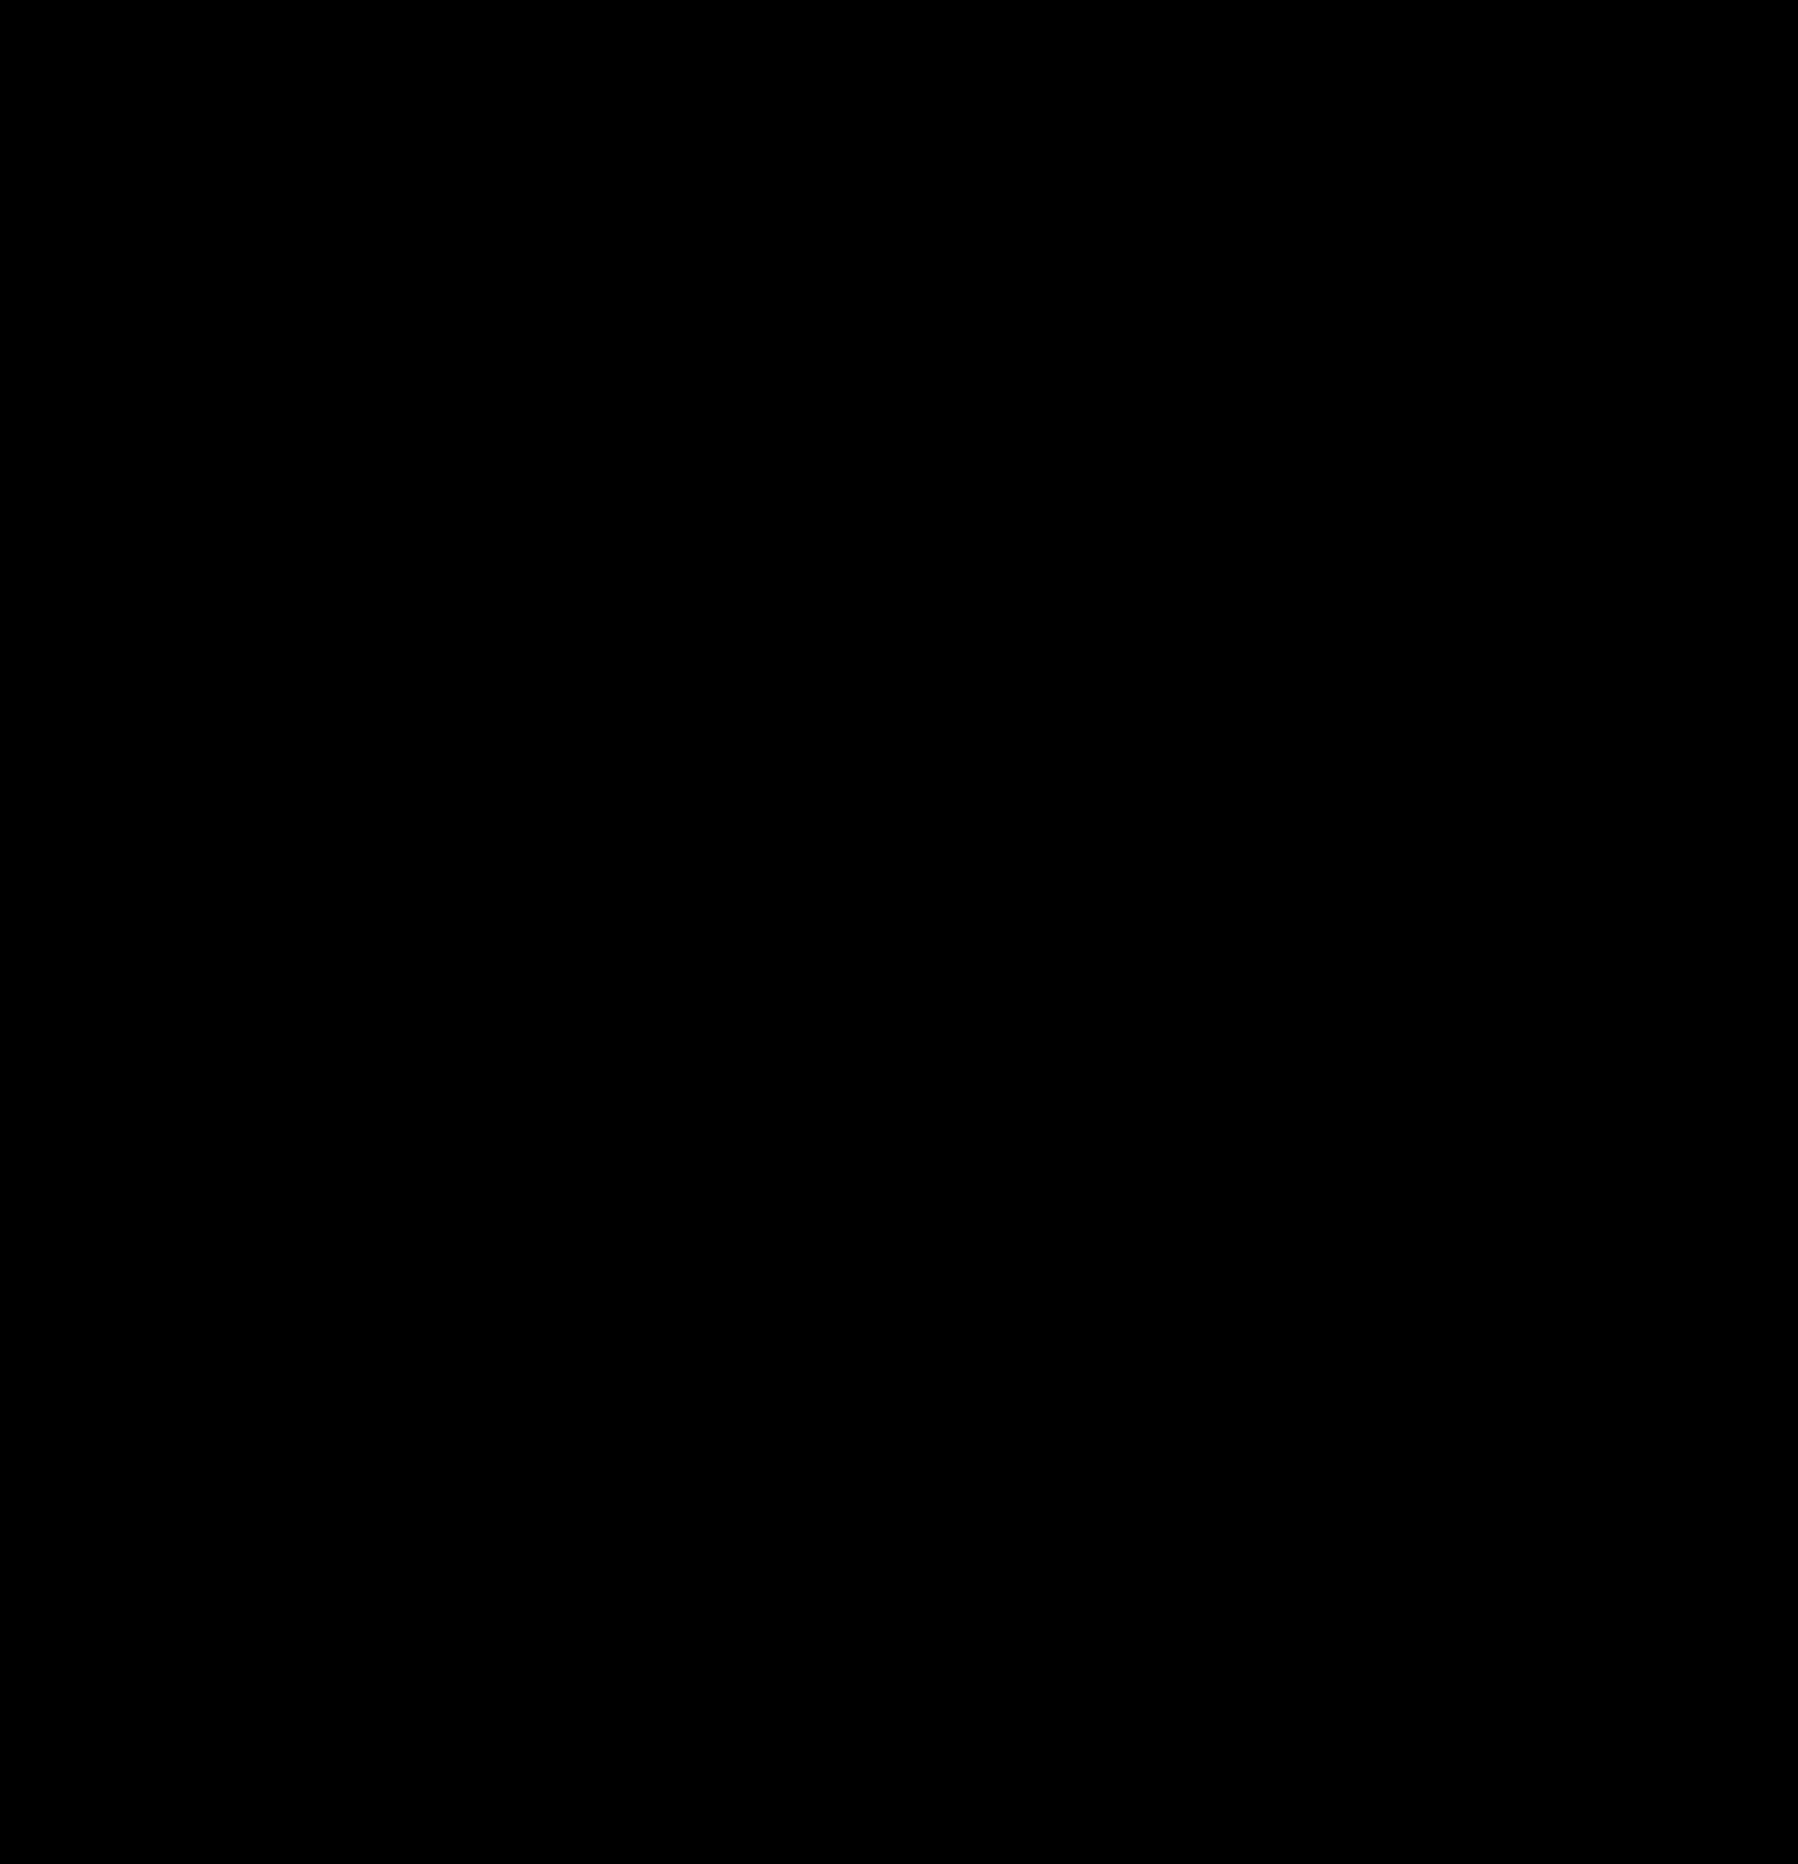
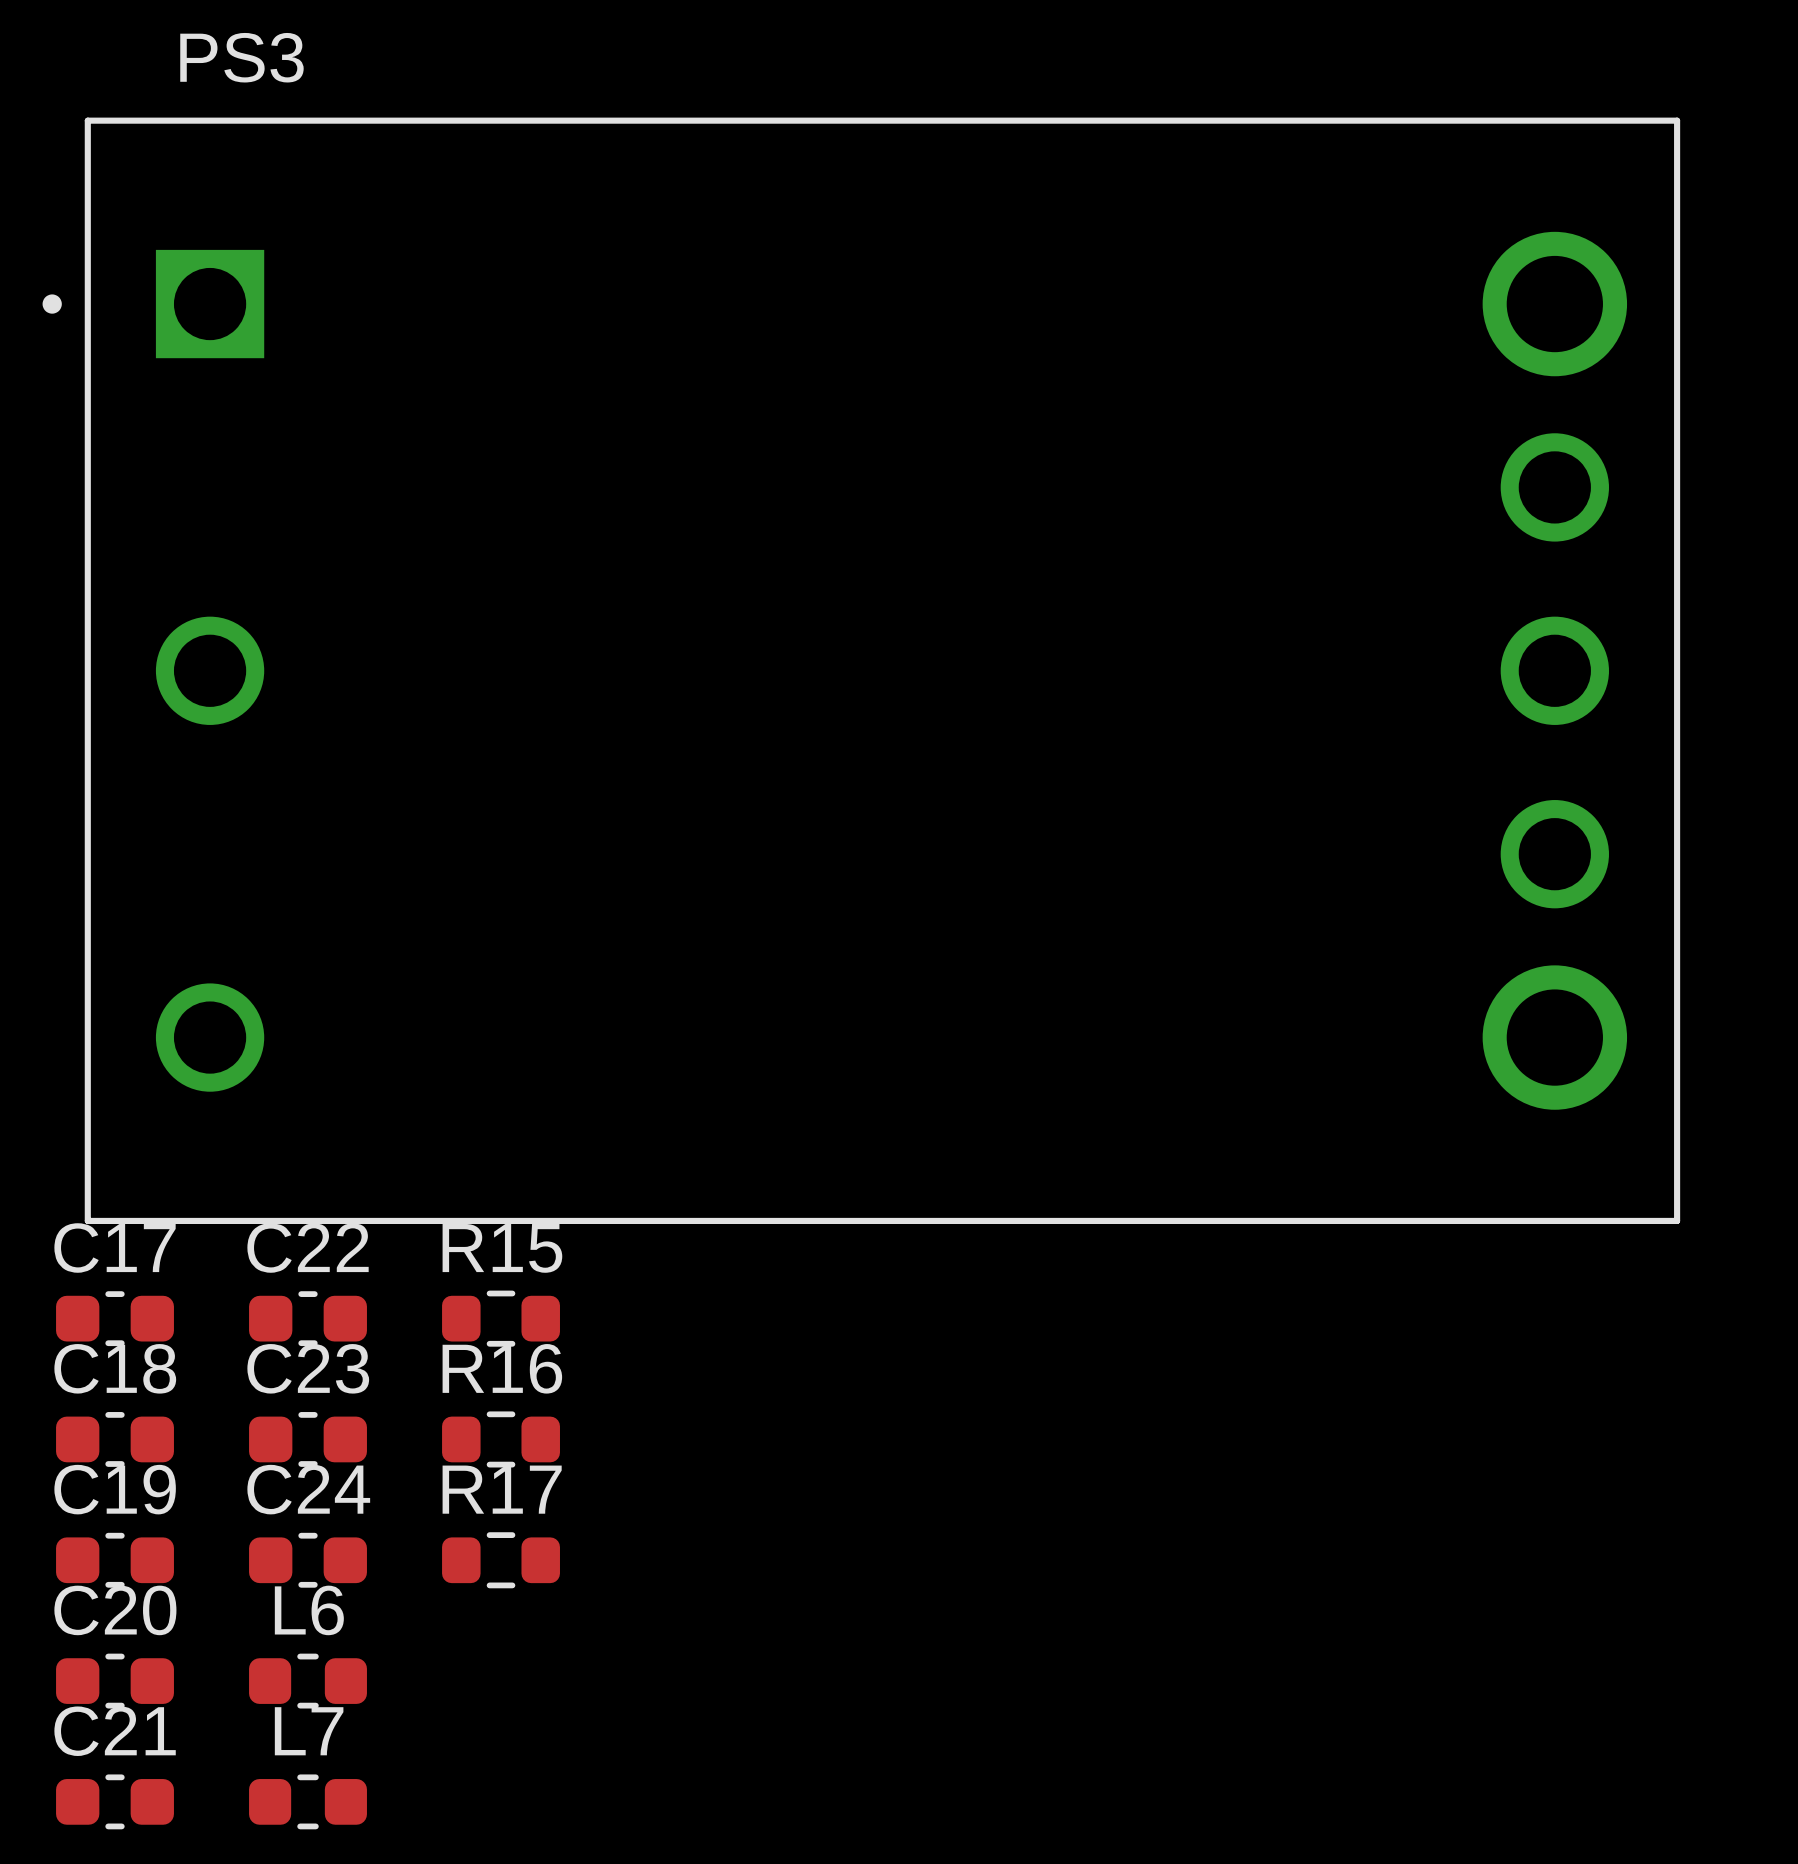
PS3: none -> (861, 670)
C17: none -> (115, 1318)
C22: none -> (308, 1318)
R15: none -> (501, 1318)
C18: none -> (115, 1439)
C23: none -> (308, 1439)
R16: none -> (501, 1439)
C19: none -> (115, 1560)
C24: none -> (308, 1560)
R17: none -> (501, 1560)
C20: none -> (115, 1681)
L6: none -> (308, 1681)
C21: none -> (115, 1801)
L7: none -> (308, 1801)

